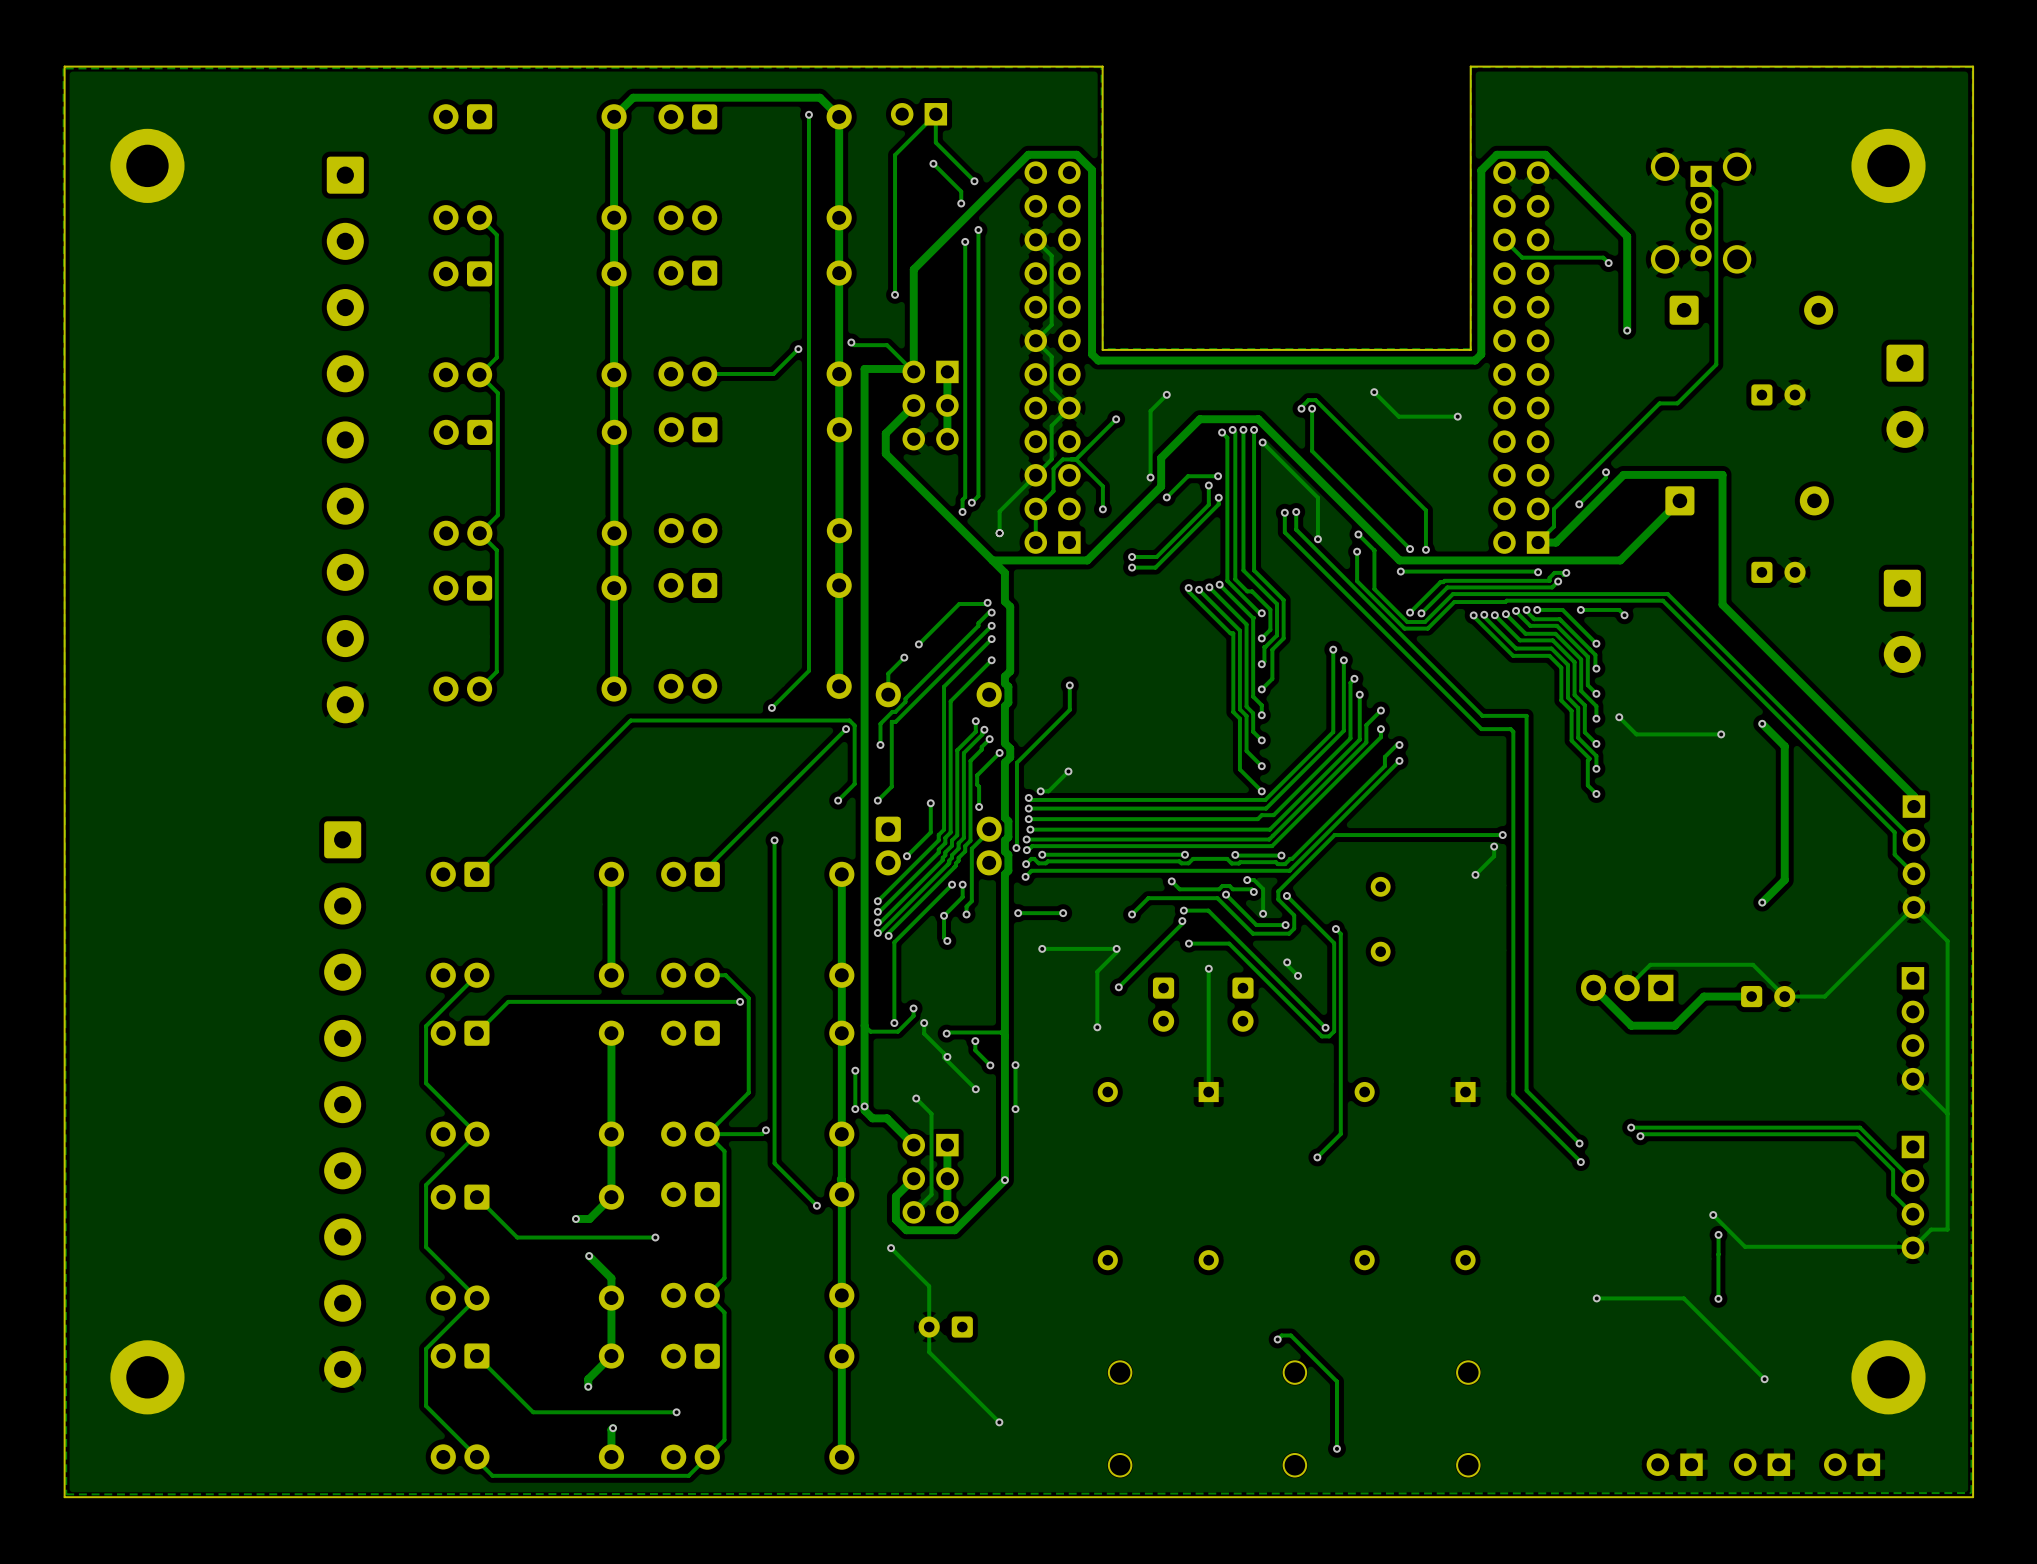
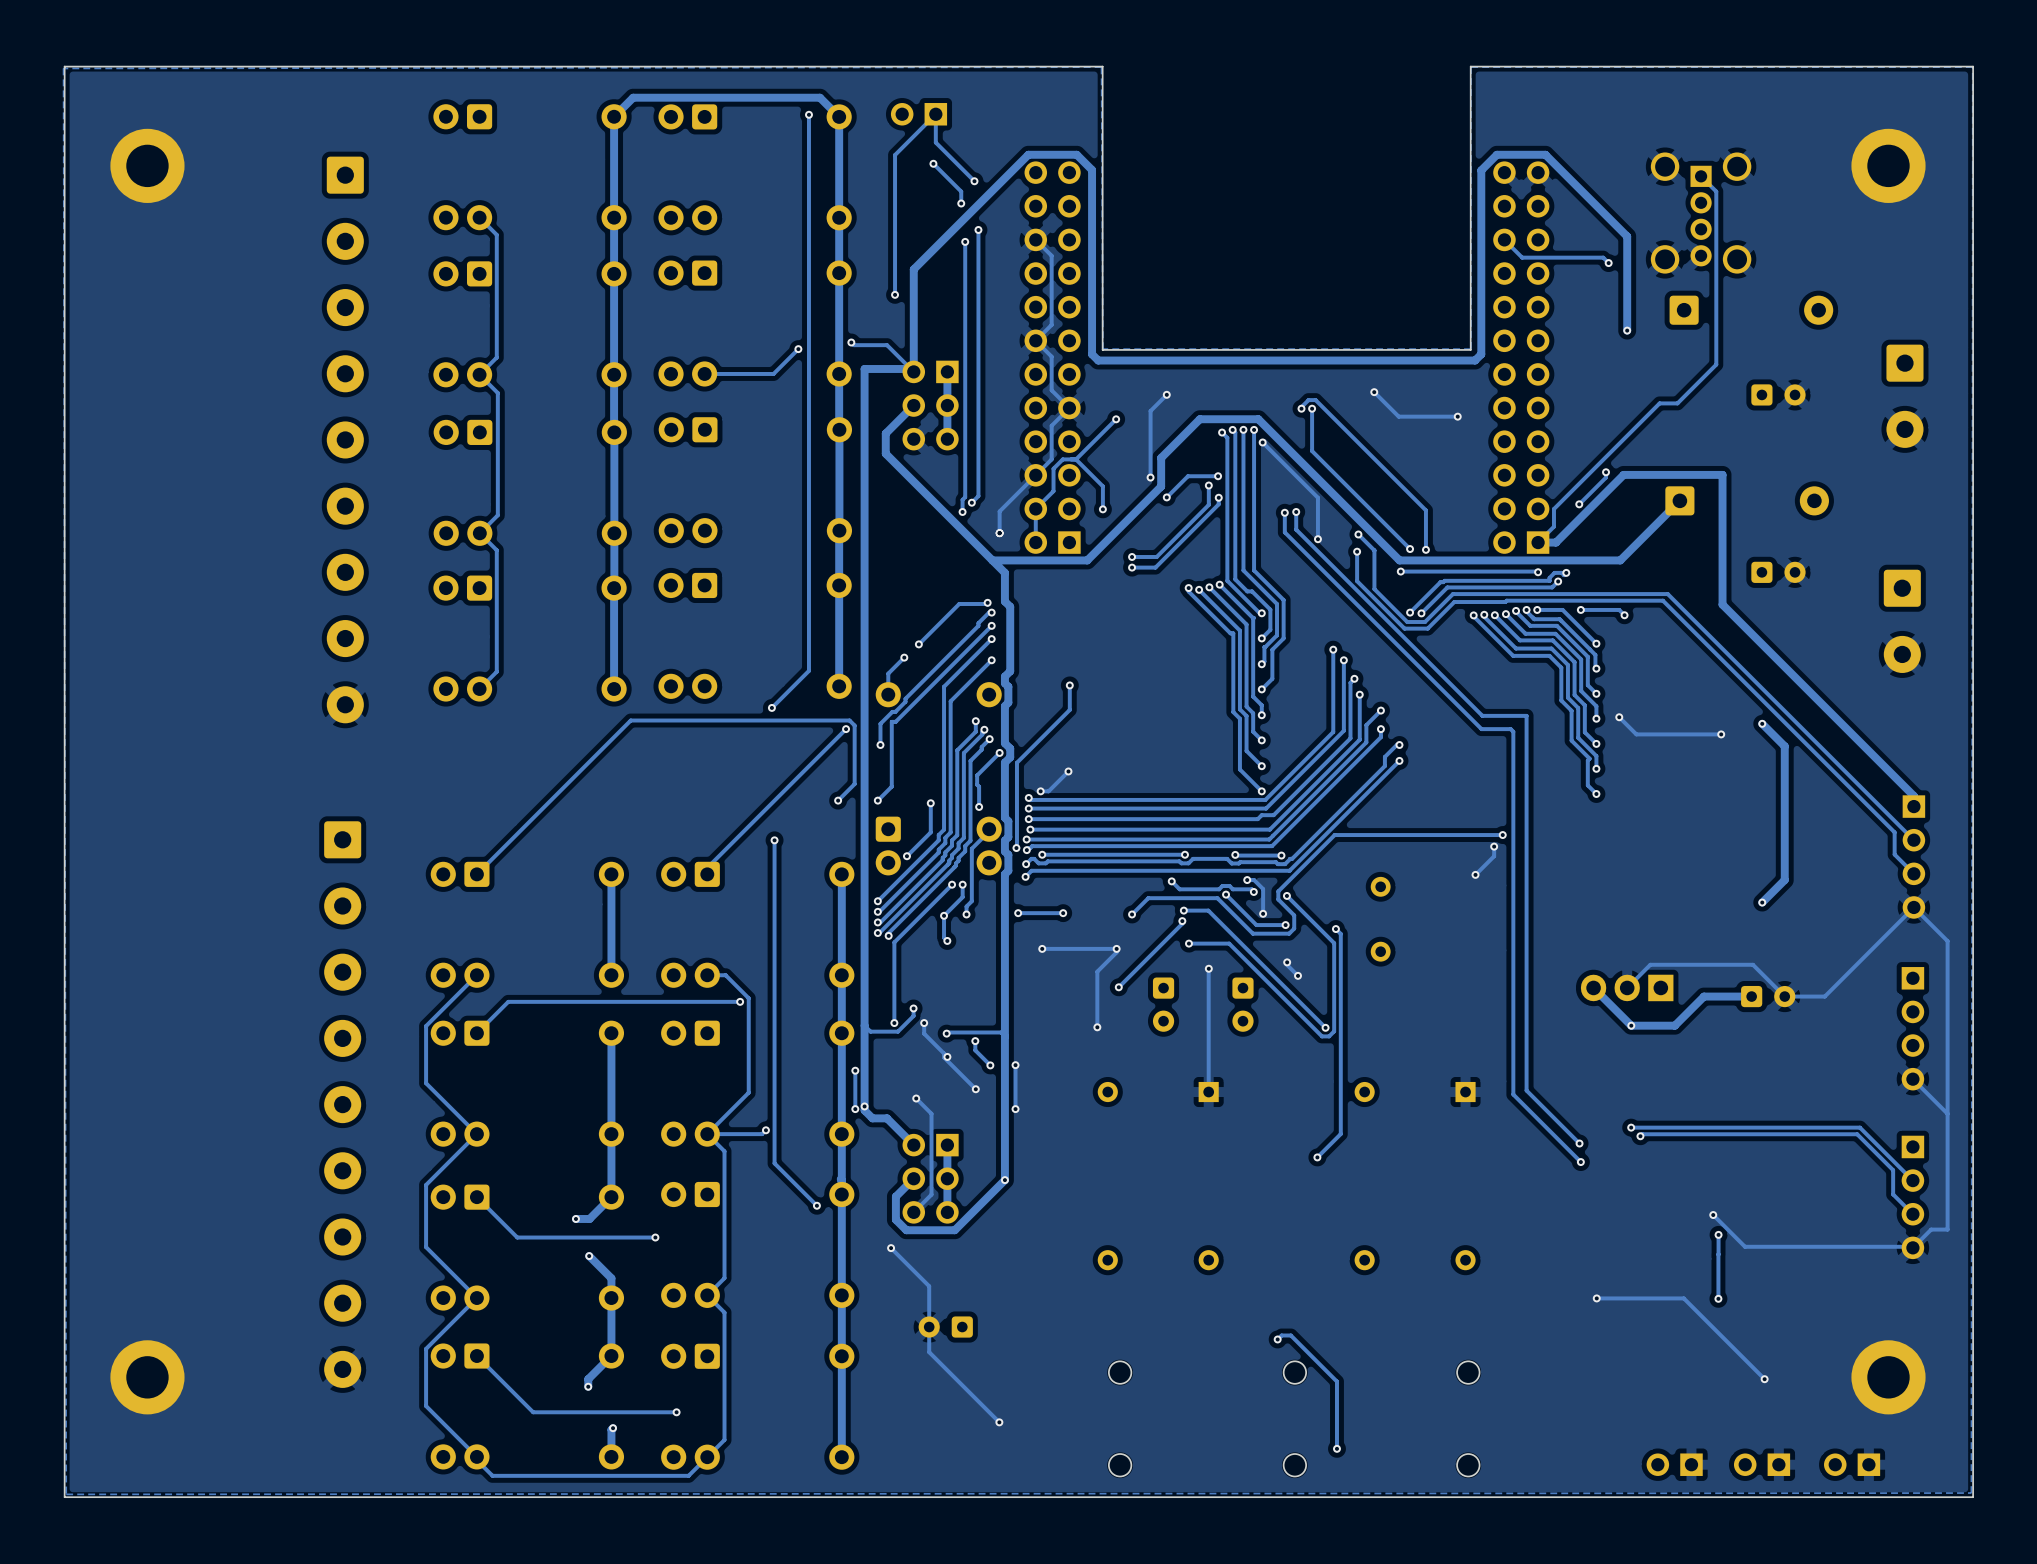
via: none -> (1631, 1025)

